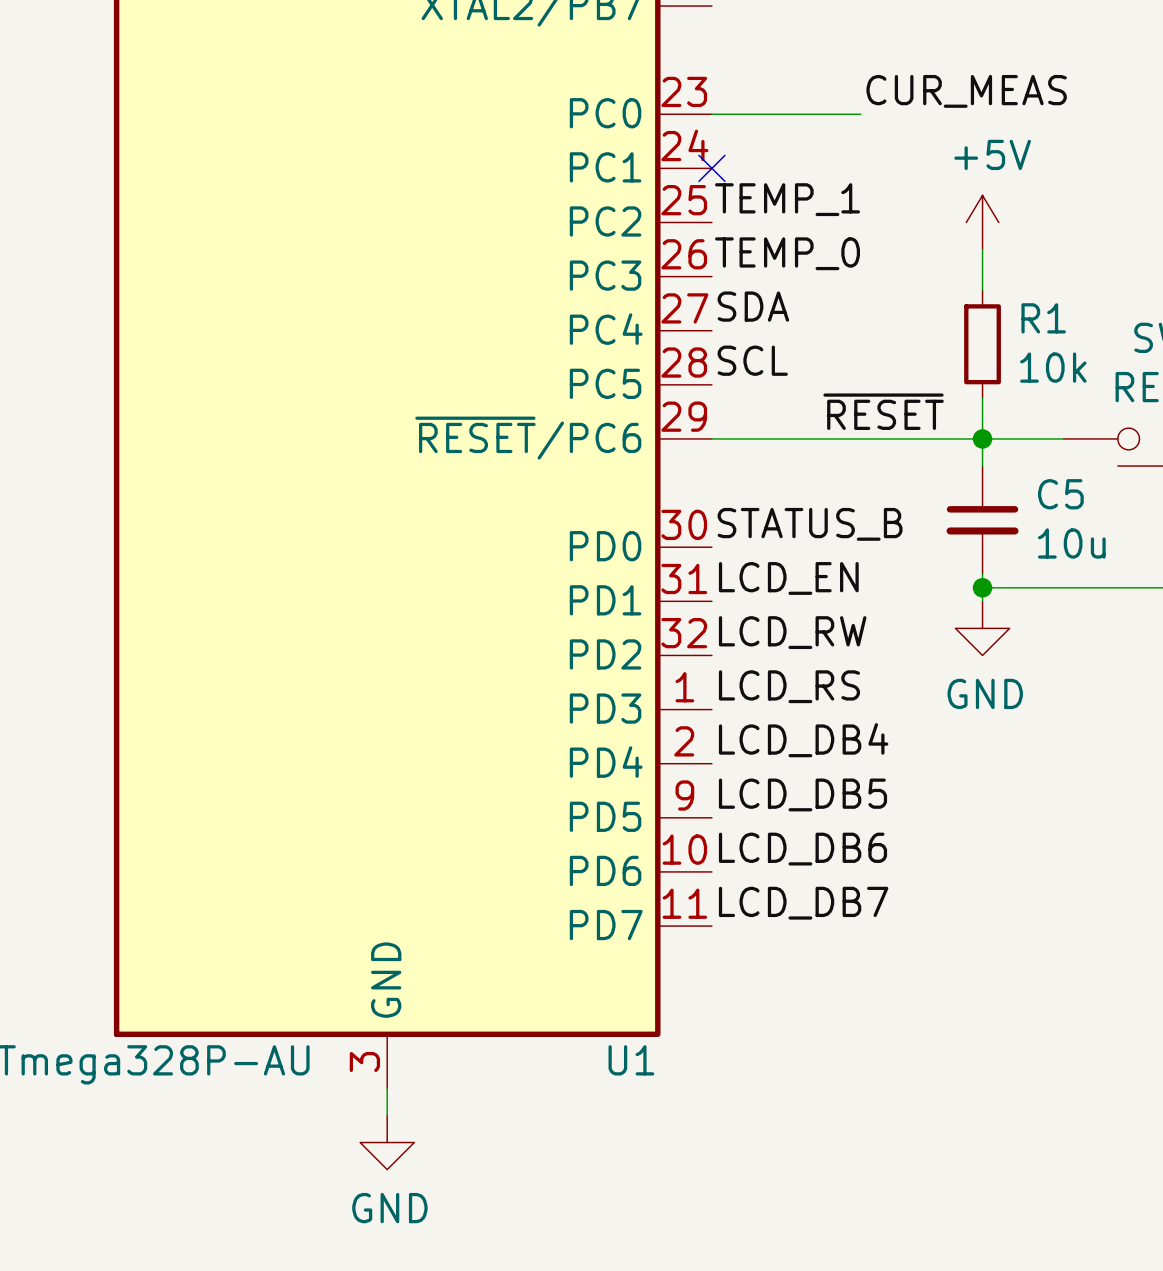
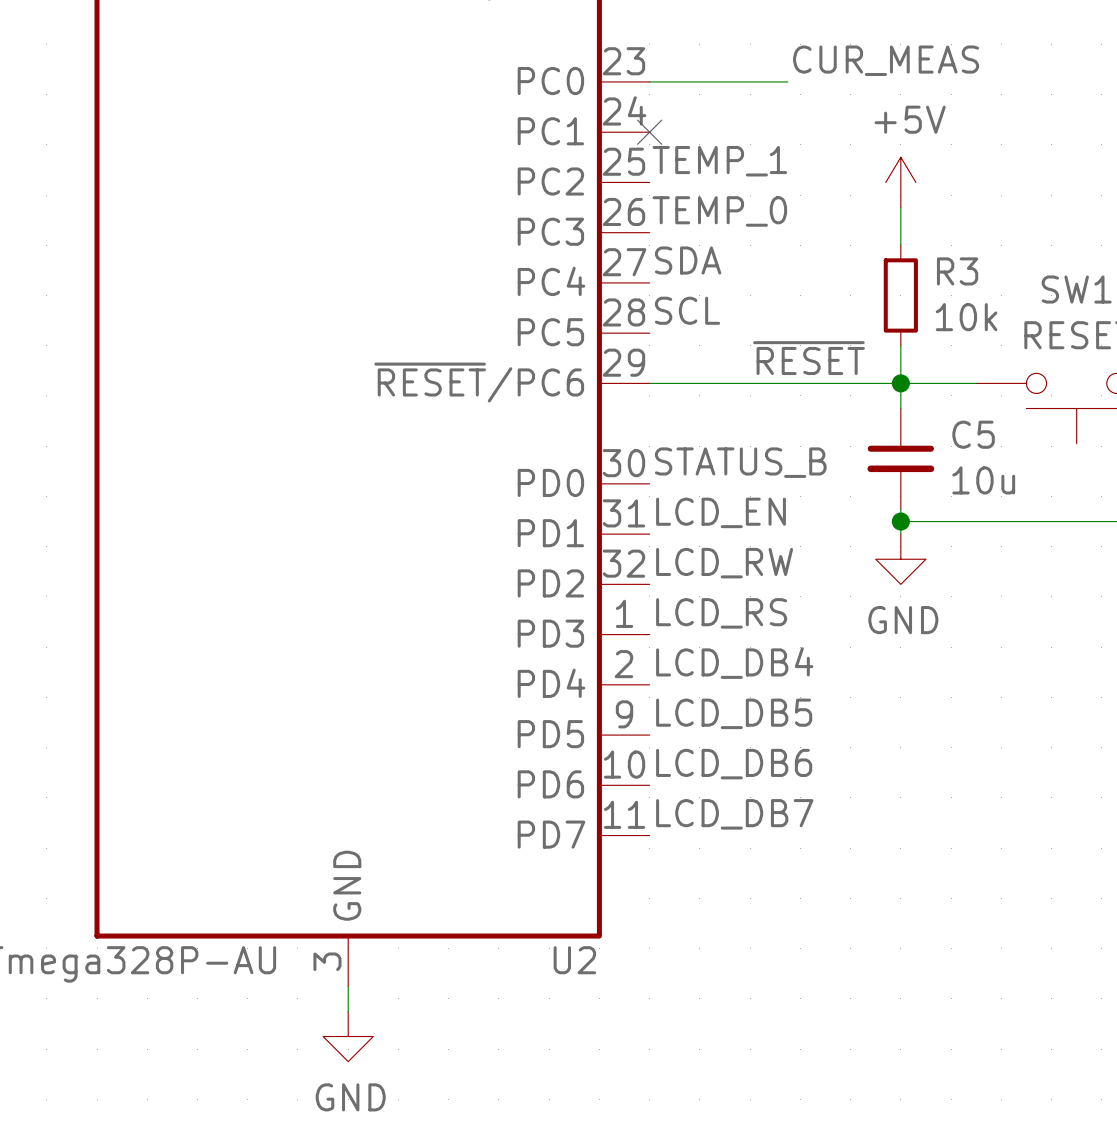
R1 name: R1 (1043, 318) -> R3 (957, 271)
U1 name: U1 (631, 1060) -> U2 (574, 960)

